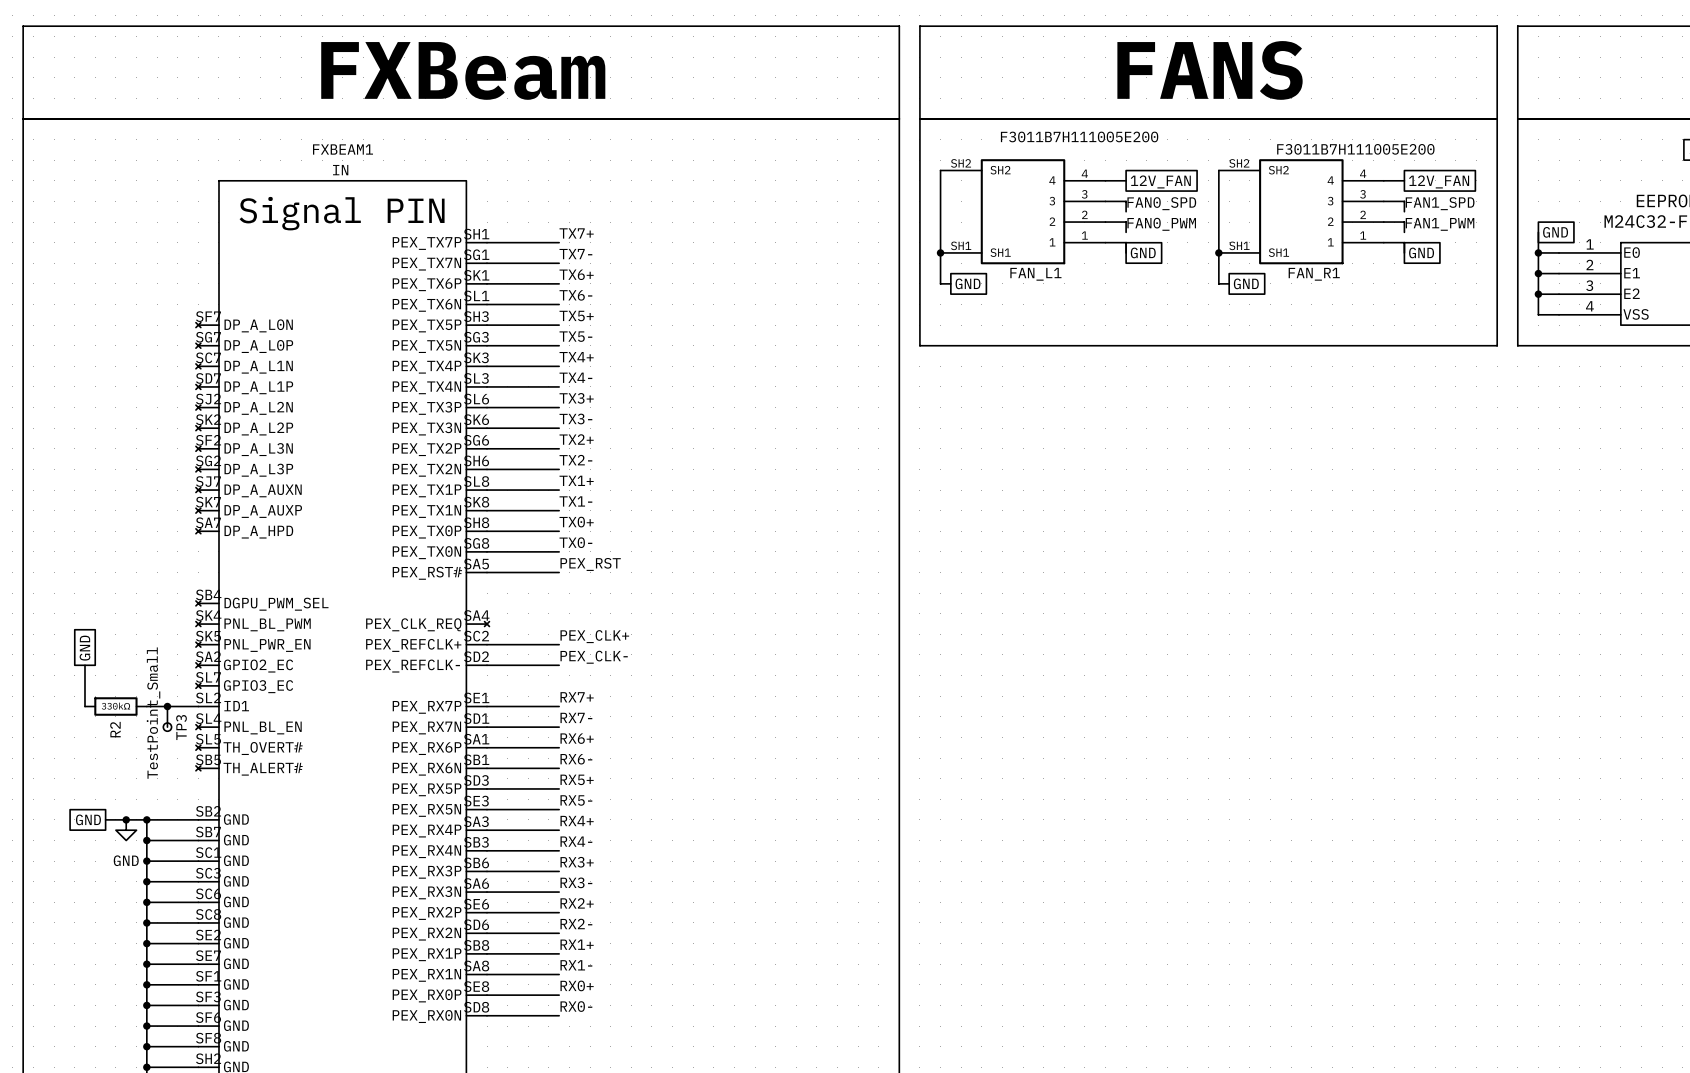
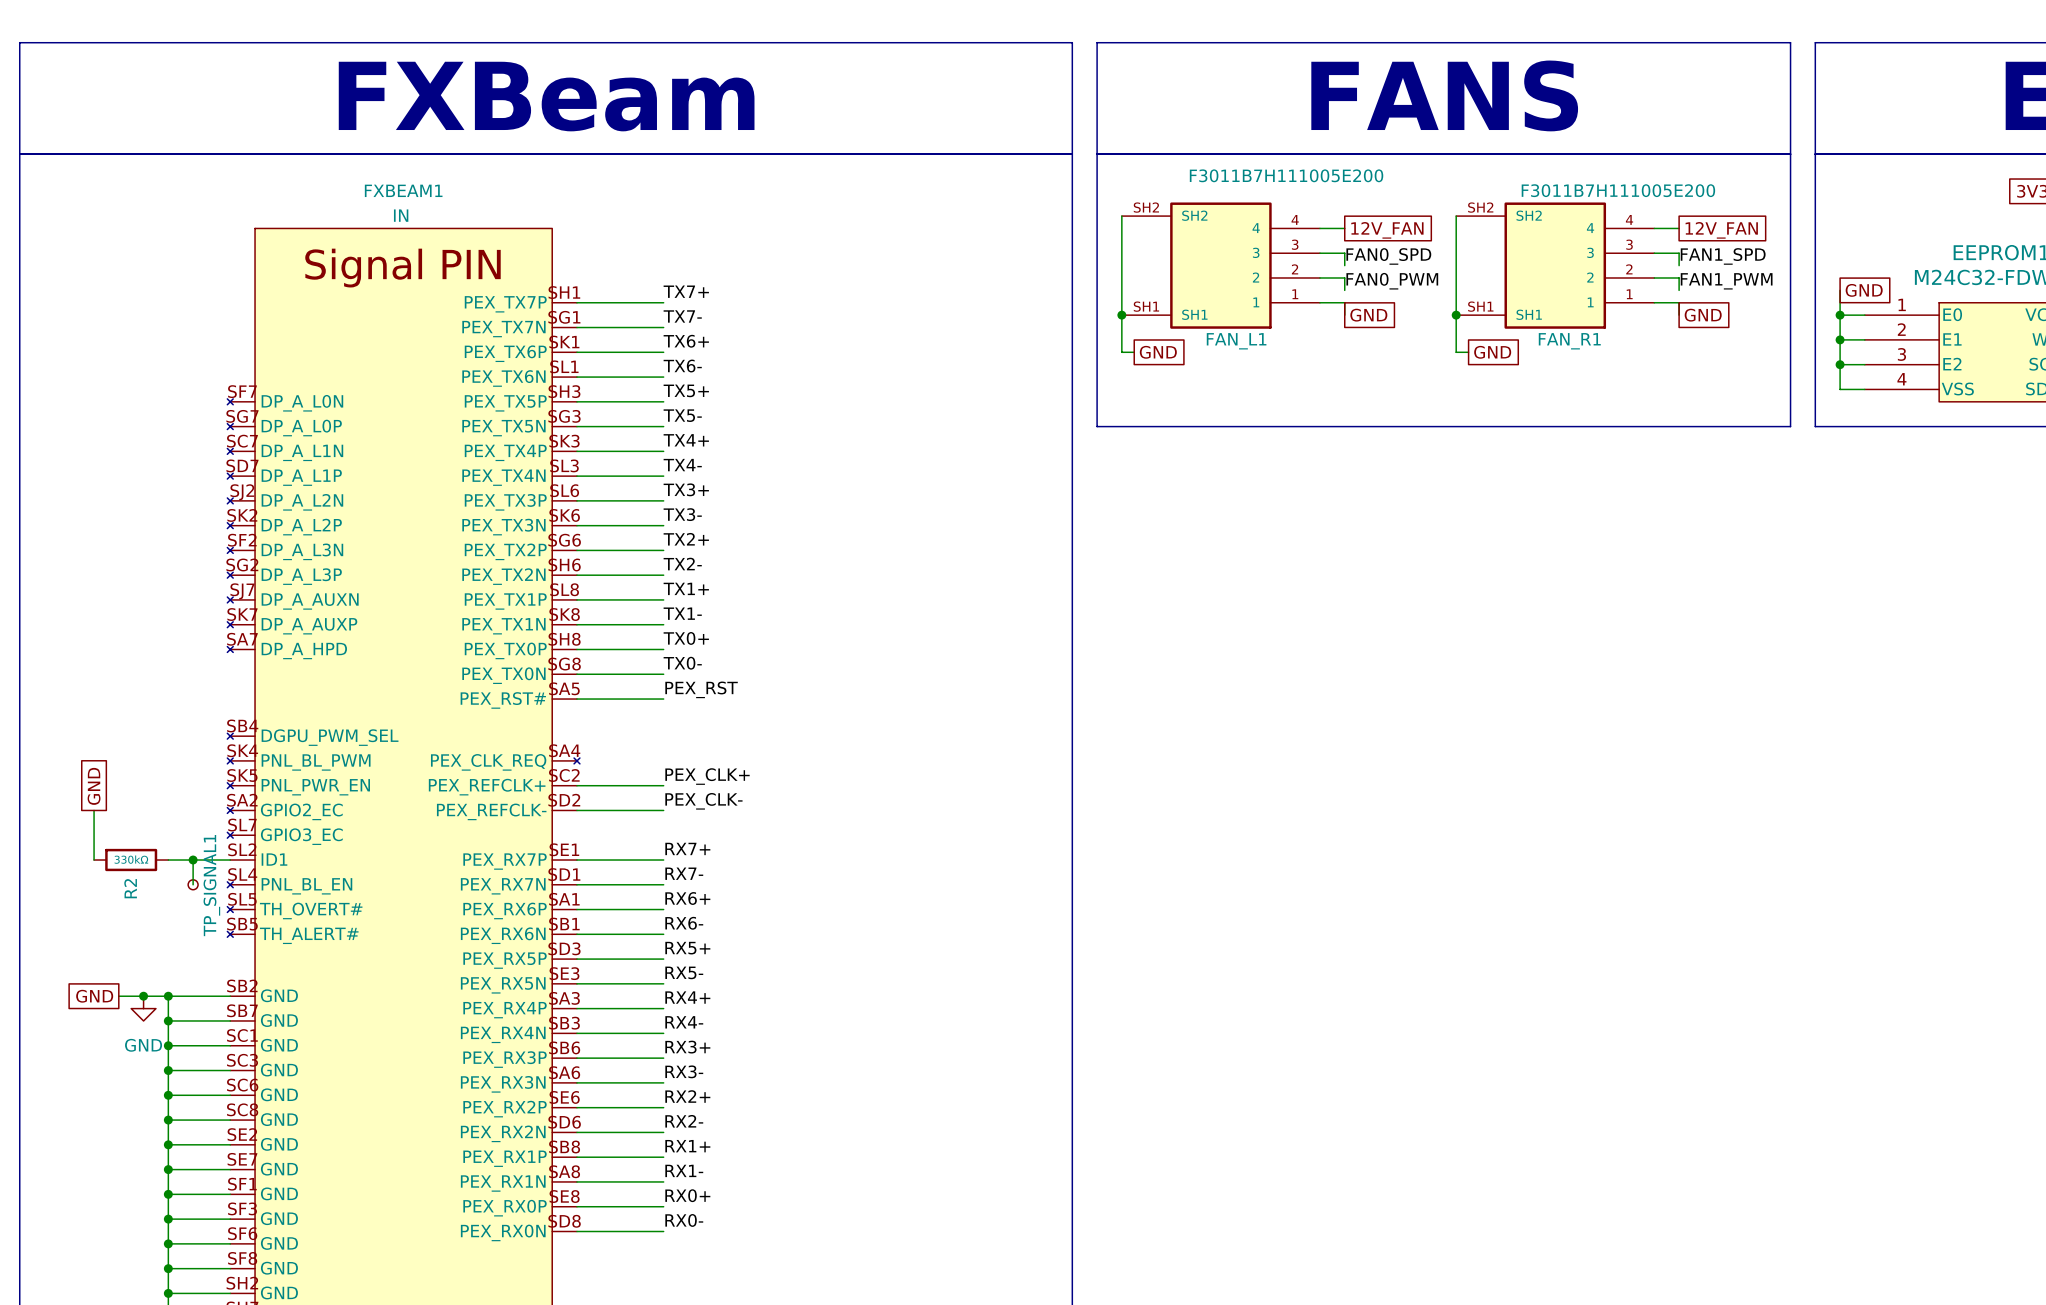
TP3 value: TestPoint_Small (153, 713) -> none
TP3 name: TP3 (181, 727) -> TP_SIGNAL1 (211, 885)

